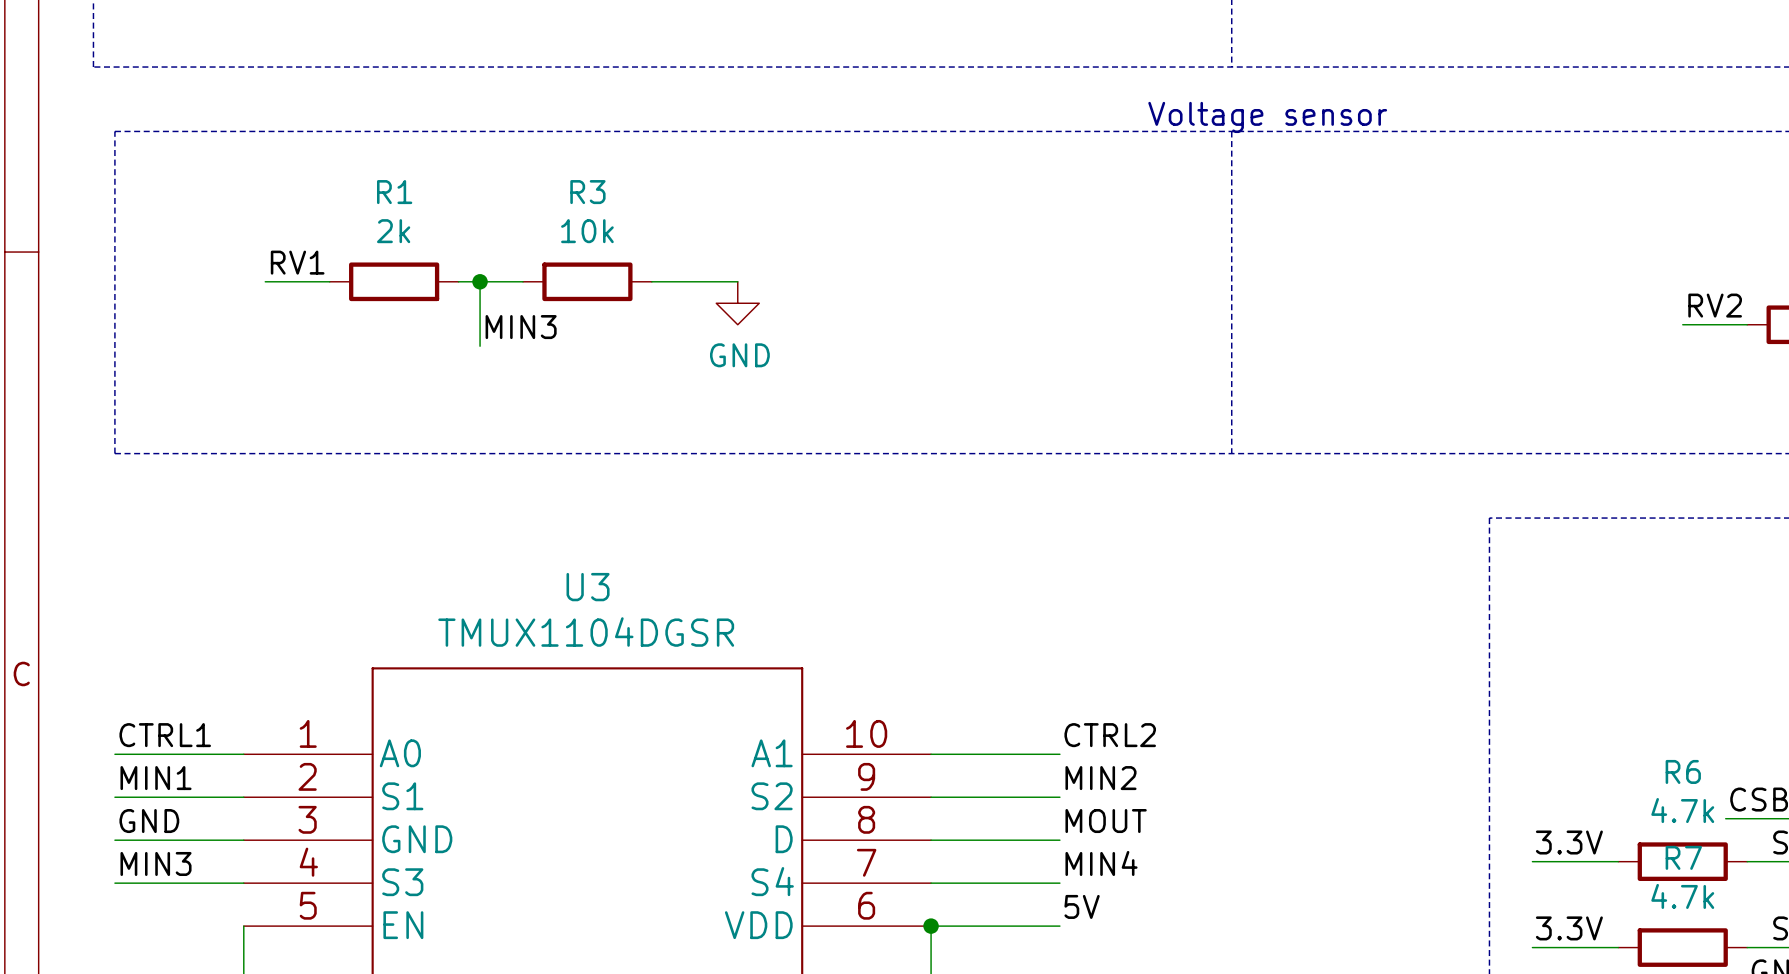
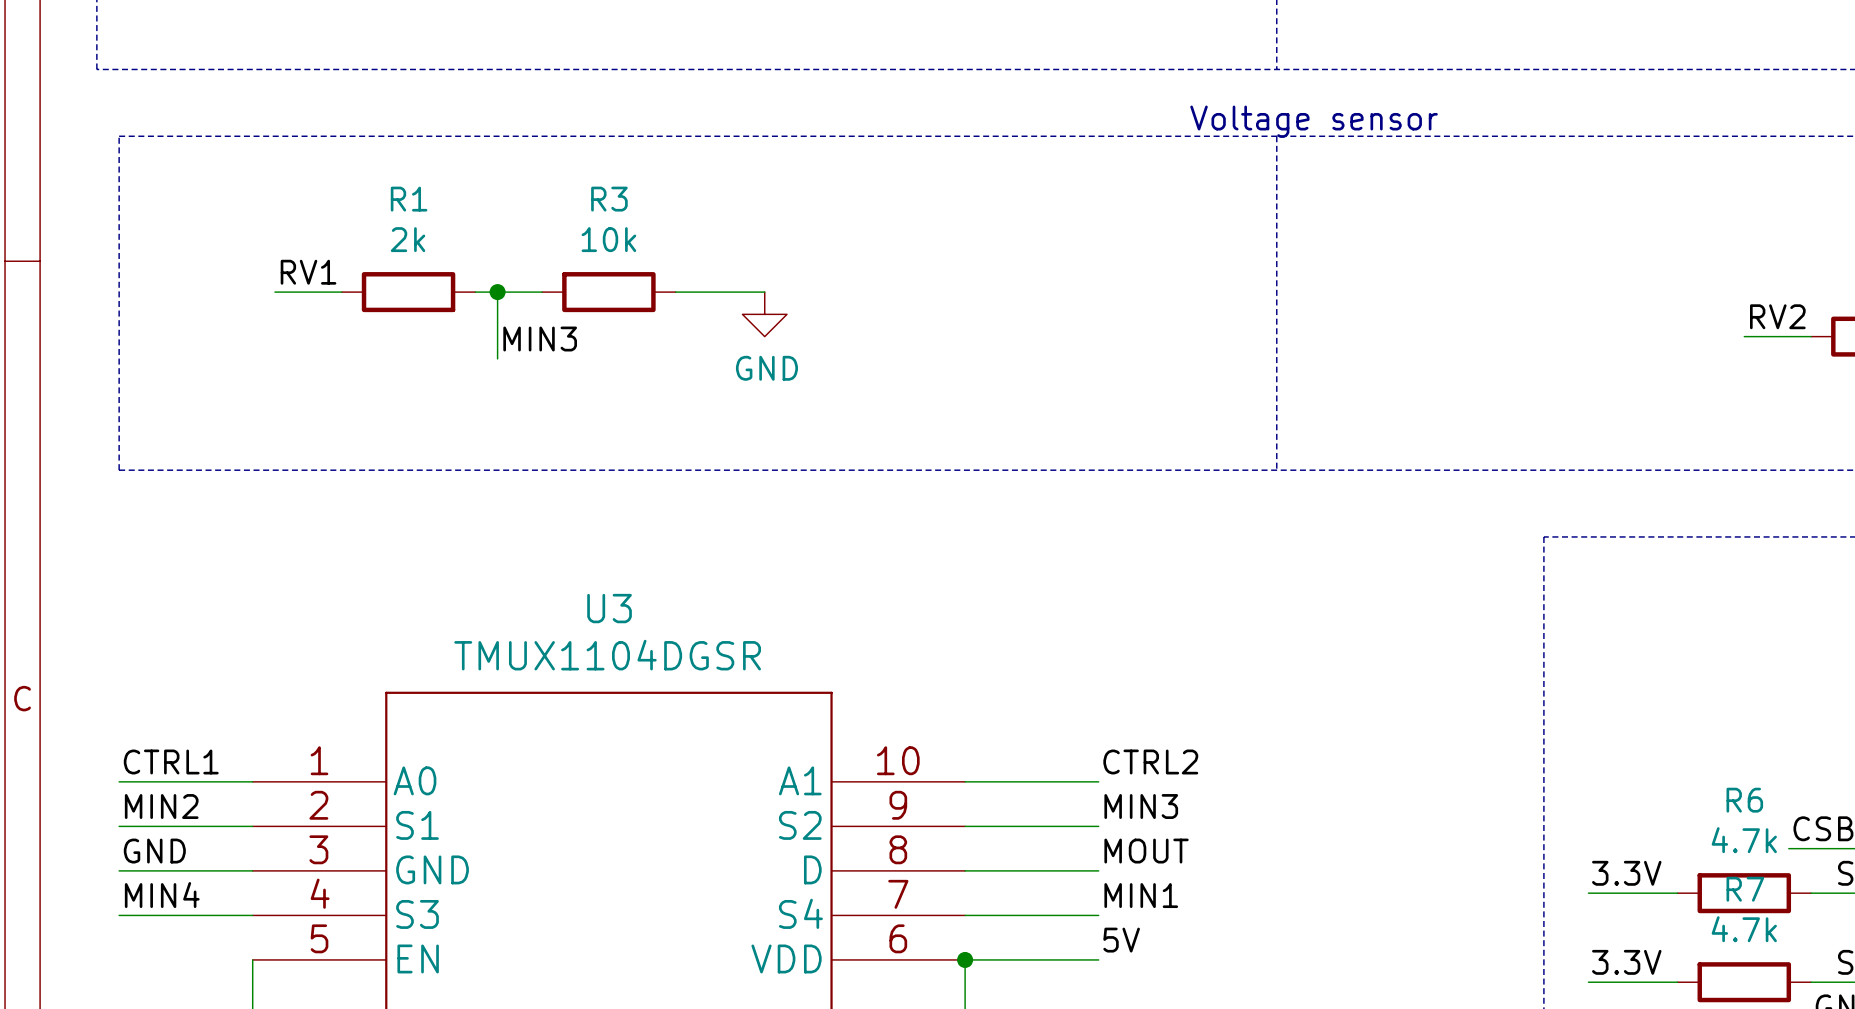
label: MIN1 (156, 778) -> MIN2 (161, 806)
label: MIN2 (1100, 778) -> MIN3 (1141, 806)
label: MIN3 (156, 863) -> MIN4 (162, 895)
label: MIN4 (1101, 863) -> MIN1 (1141, 895)

